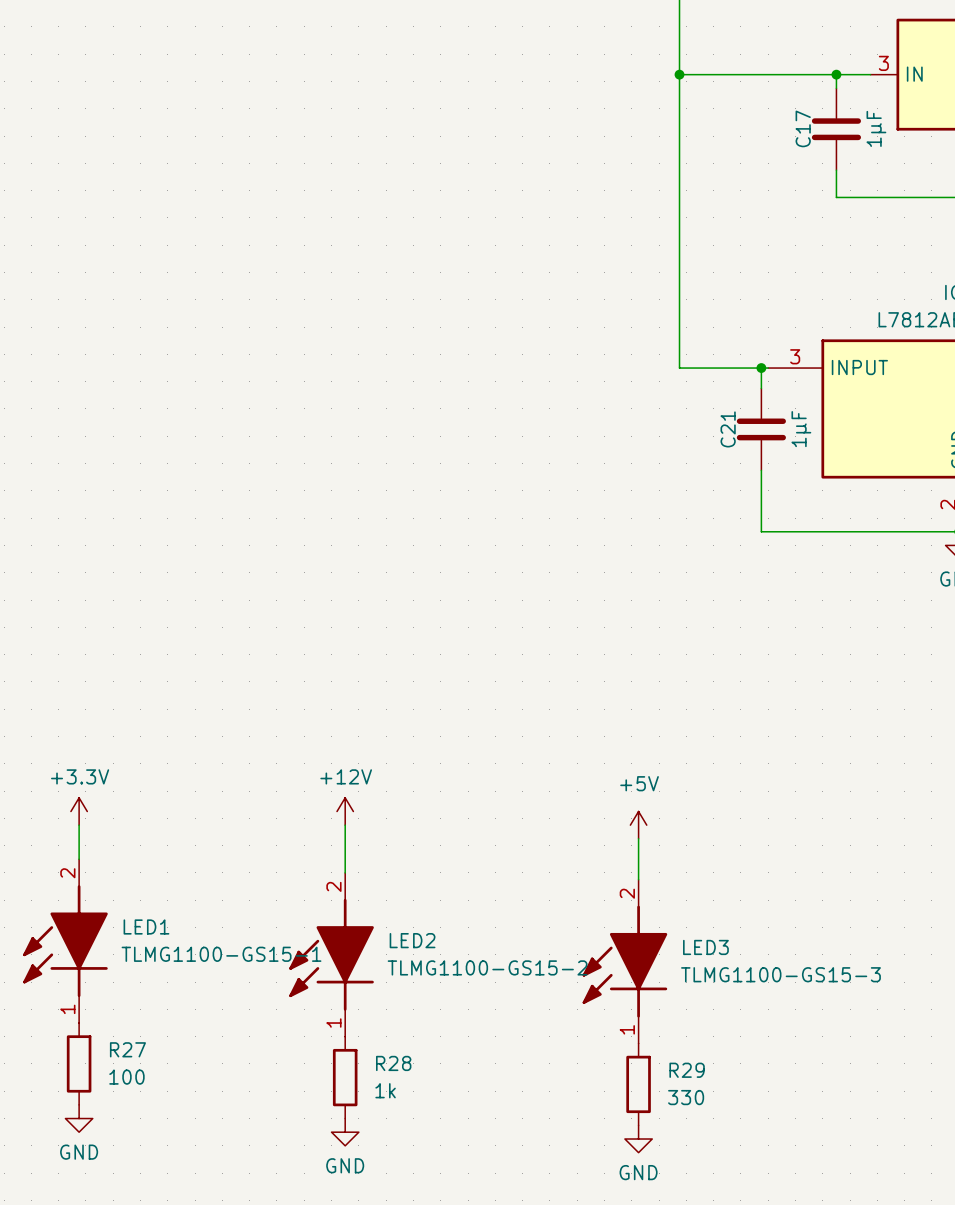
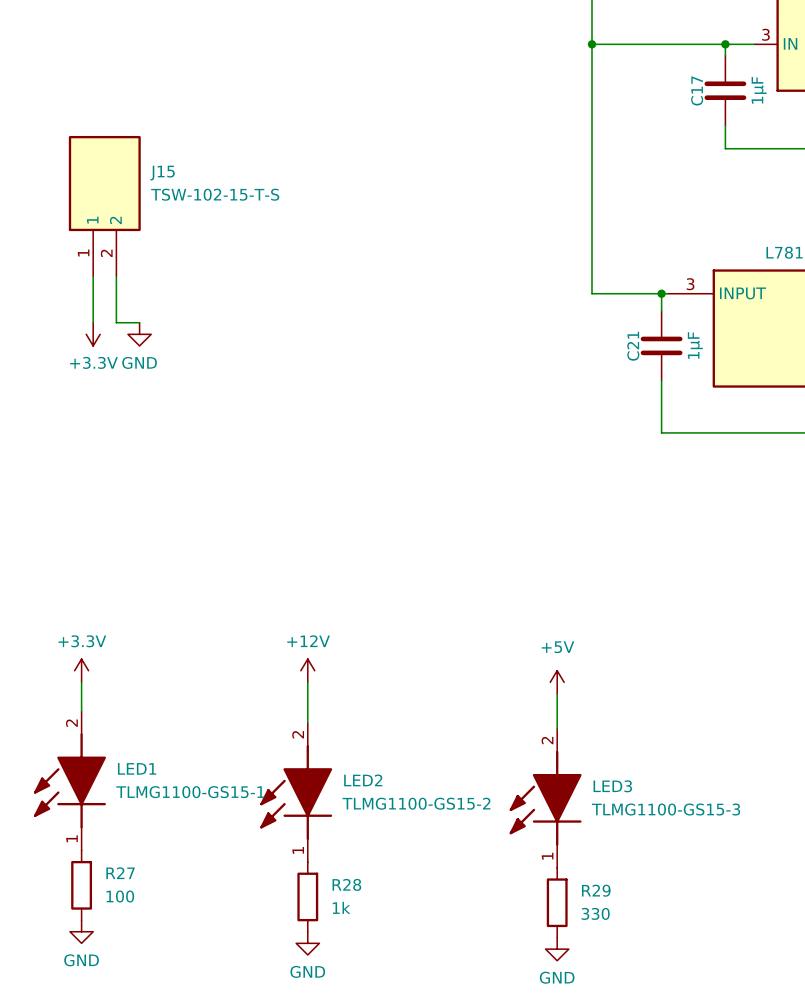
J15: none -> TSW-102-15-T-S (104, 206)
wire: none -> (93, 276) (93, 322)
wire: none -> (116, 276) (116, 322) (139, 322)
power symbol: none -> +3.3V (93, 334)
power symbol: none -> GND (139, 334)

